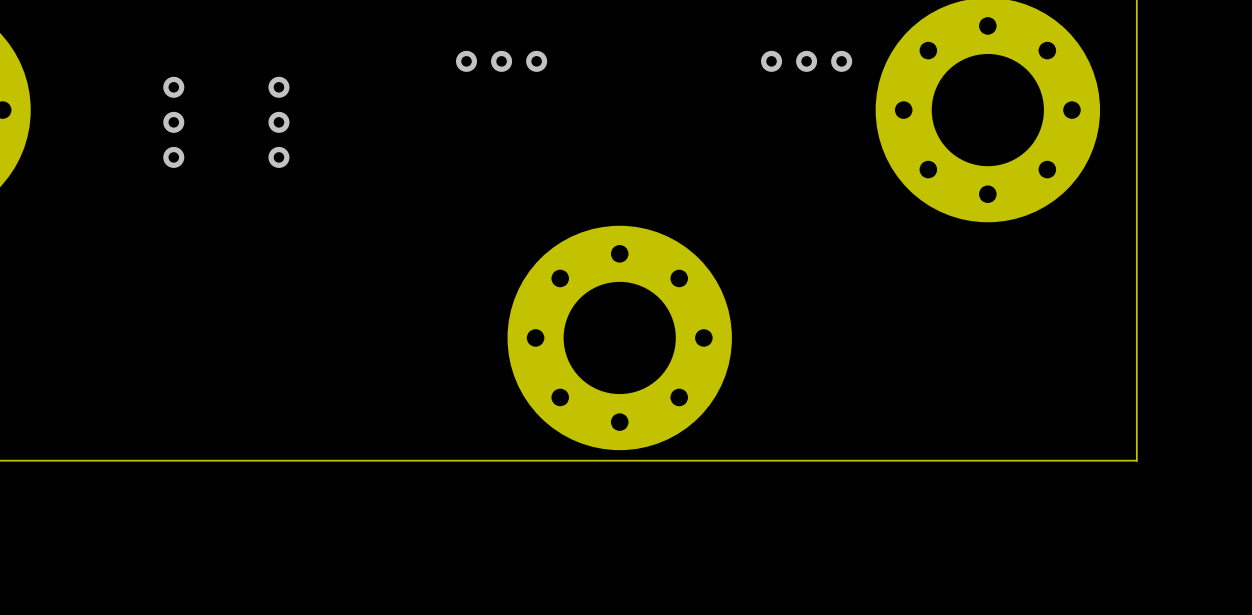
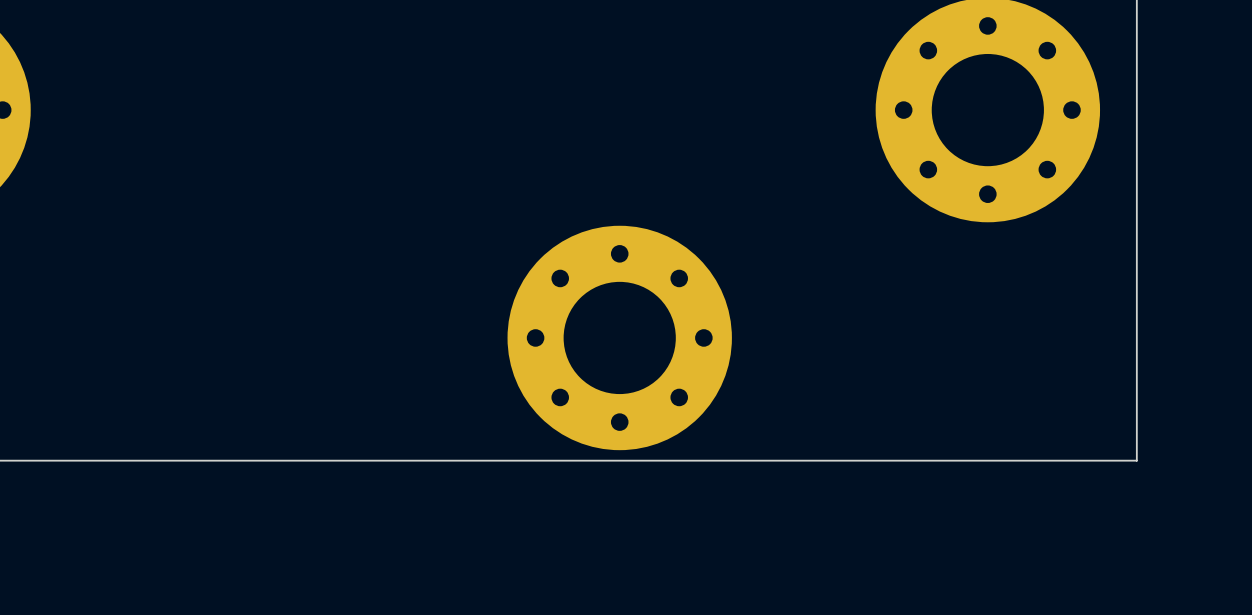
via: (466, 61) -> none
via: (501, 61) -> none
via: (536, 61) -> none
via: (771, 61) -> none
via: (806, 61) -> none
via: (841, 61) -> none
via: (173, 87) -> none
via: (278, 87) -> none
via: (173, 122) -> none
via: (278, 122) -> none
via: (173, 157) -> none
via: (278, 157) -> none

